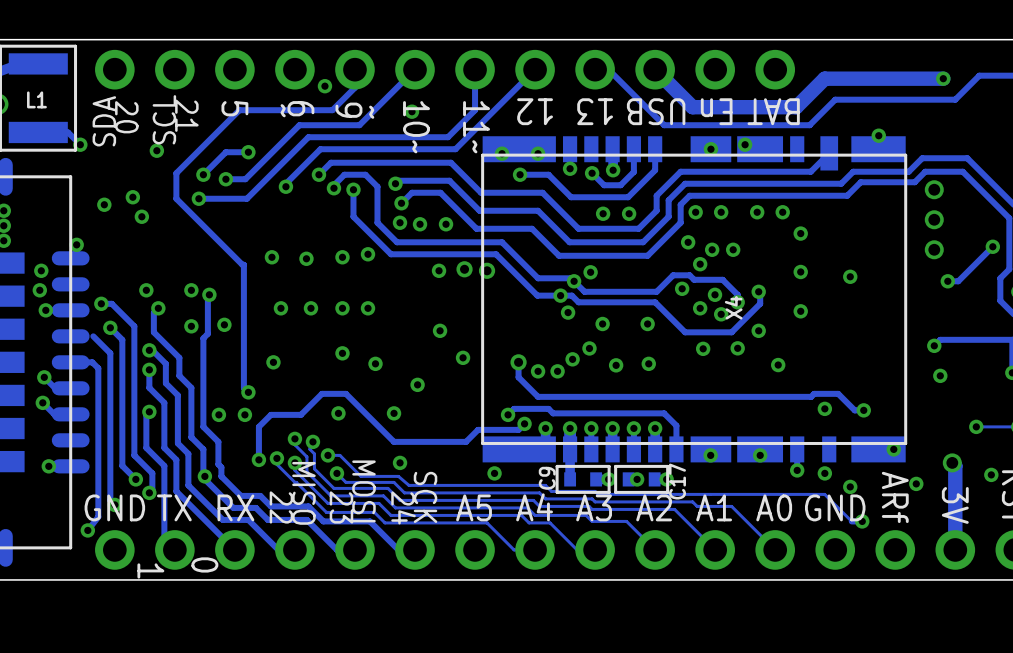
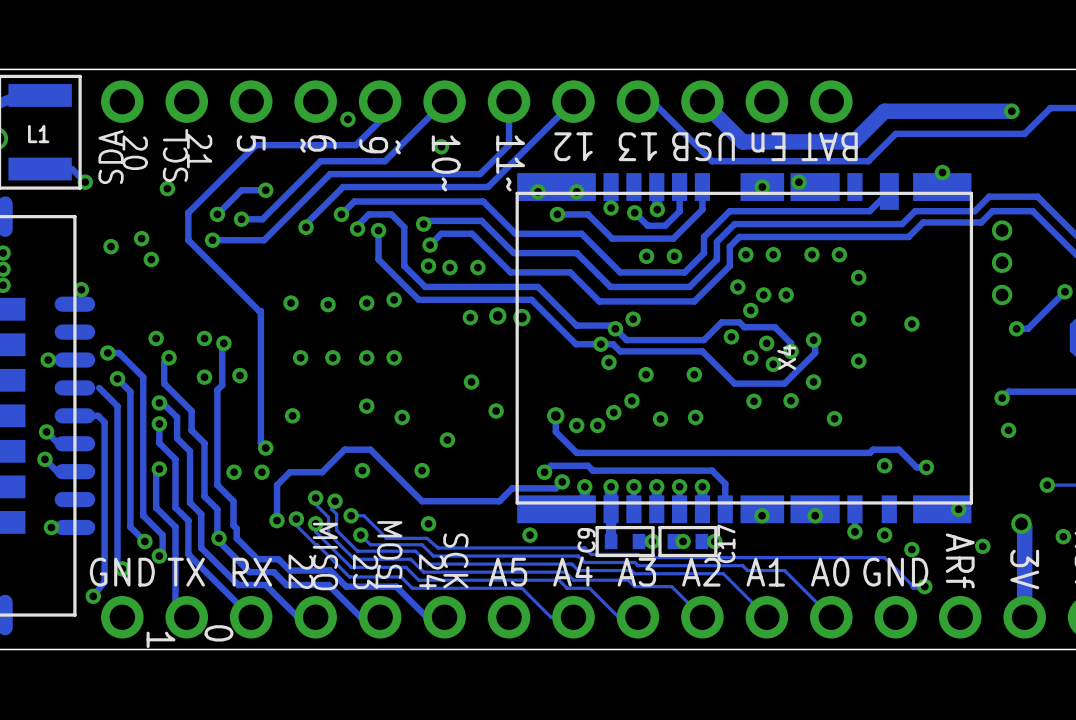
via: (41, 270) -> none
via: (39, 290) -> none

